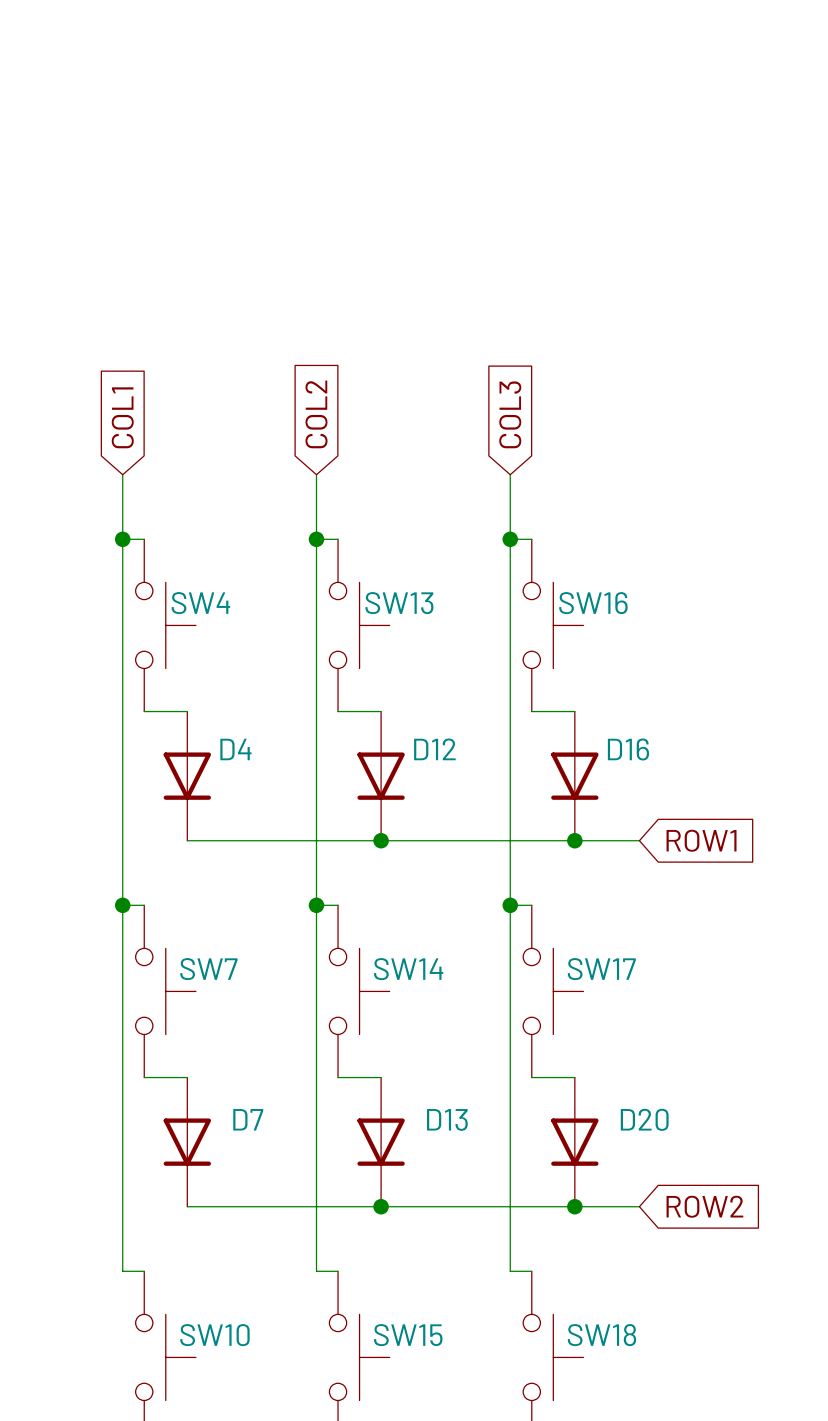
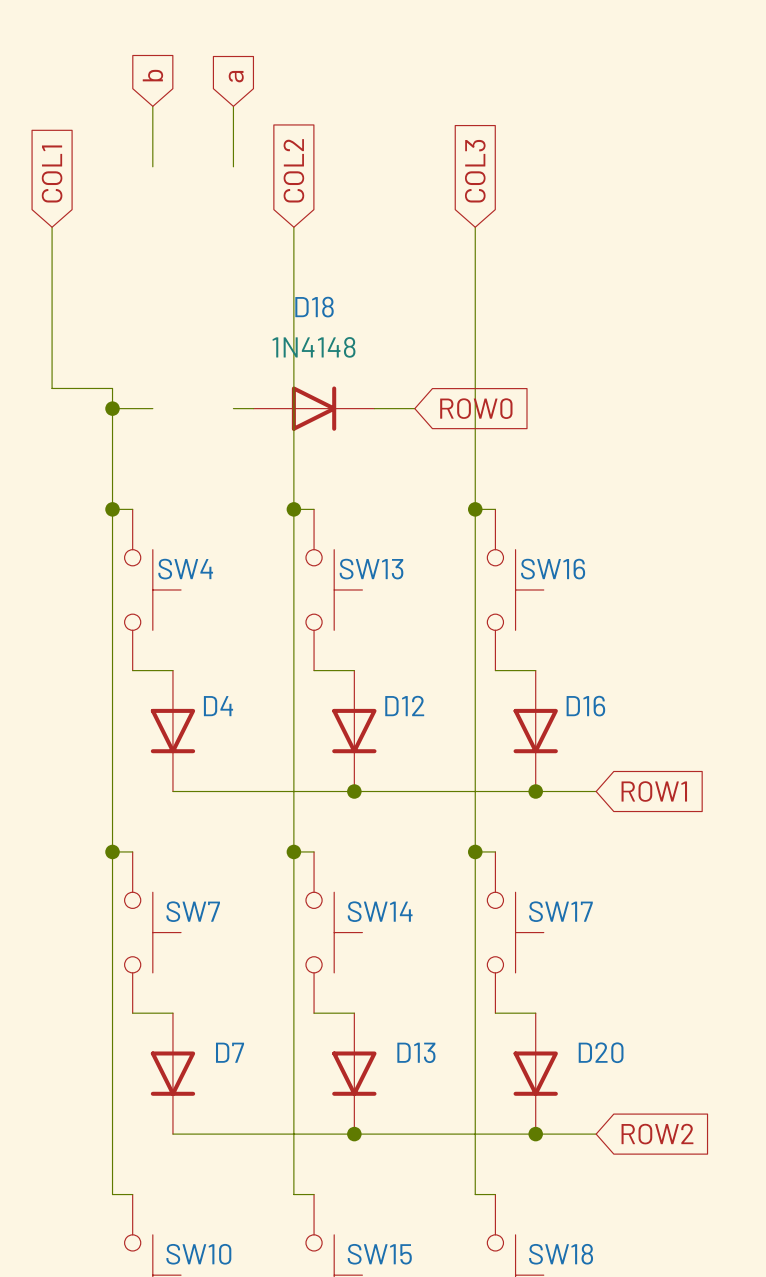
global label: none -> b (152, 75)
global label: none -> a (236, 76)
wire: none -> (152, 106) (152, 166)
wire: none -> (233, 106) (233, 166)
wire: none -> (52, 227) (52, 388) (112, 388) (112, 448)
wire: none -> (293, 227) (293, 448)
wire: none -> (475, 227) (475, 448)
global label position: COL2 (316, 414) -> COL2 (293, 170)
global label position: COL3 (510, 414) -> COL3 (475, 171)
global label position: COL1 (122, 417) -> COL1 (52, 173)
wire: none -> (112, 408) (152, 408)
junction: none -> (112, 408)
wire: none -> (233, 408) (253, 408)
D18: none -> 1N4148 (314, 408)
wire: none -> (374, 408) (414, 408)
global label: none -> ROW0 (476, 408)

